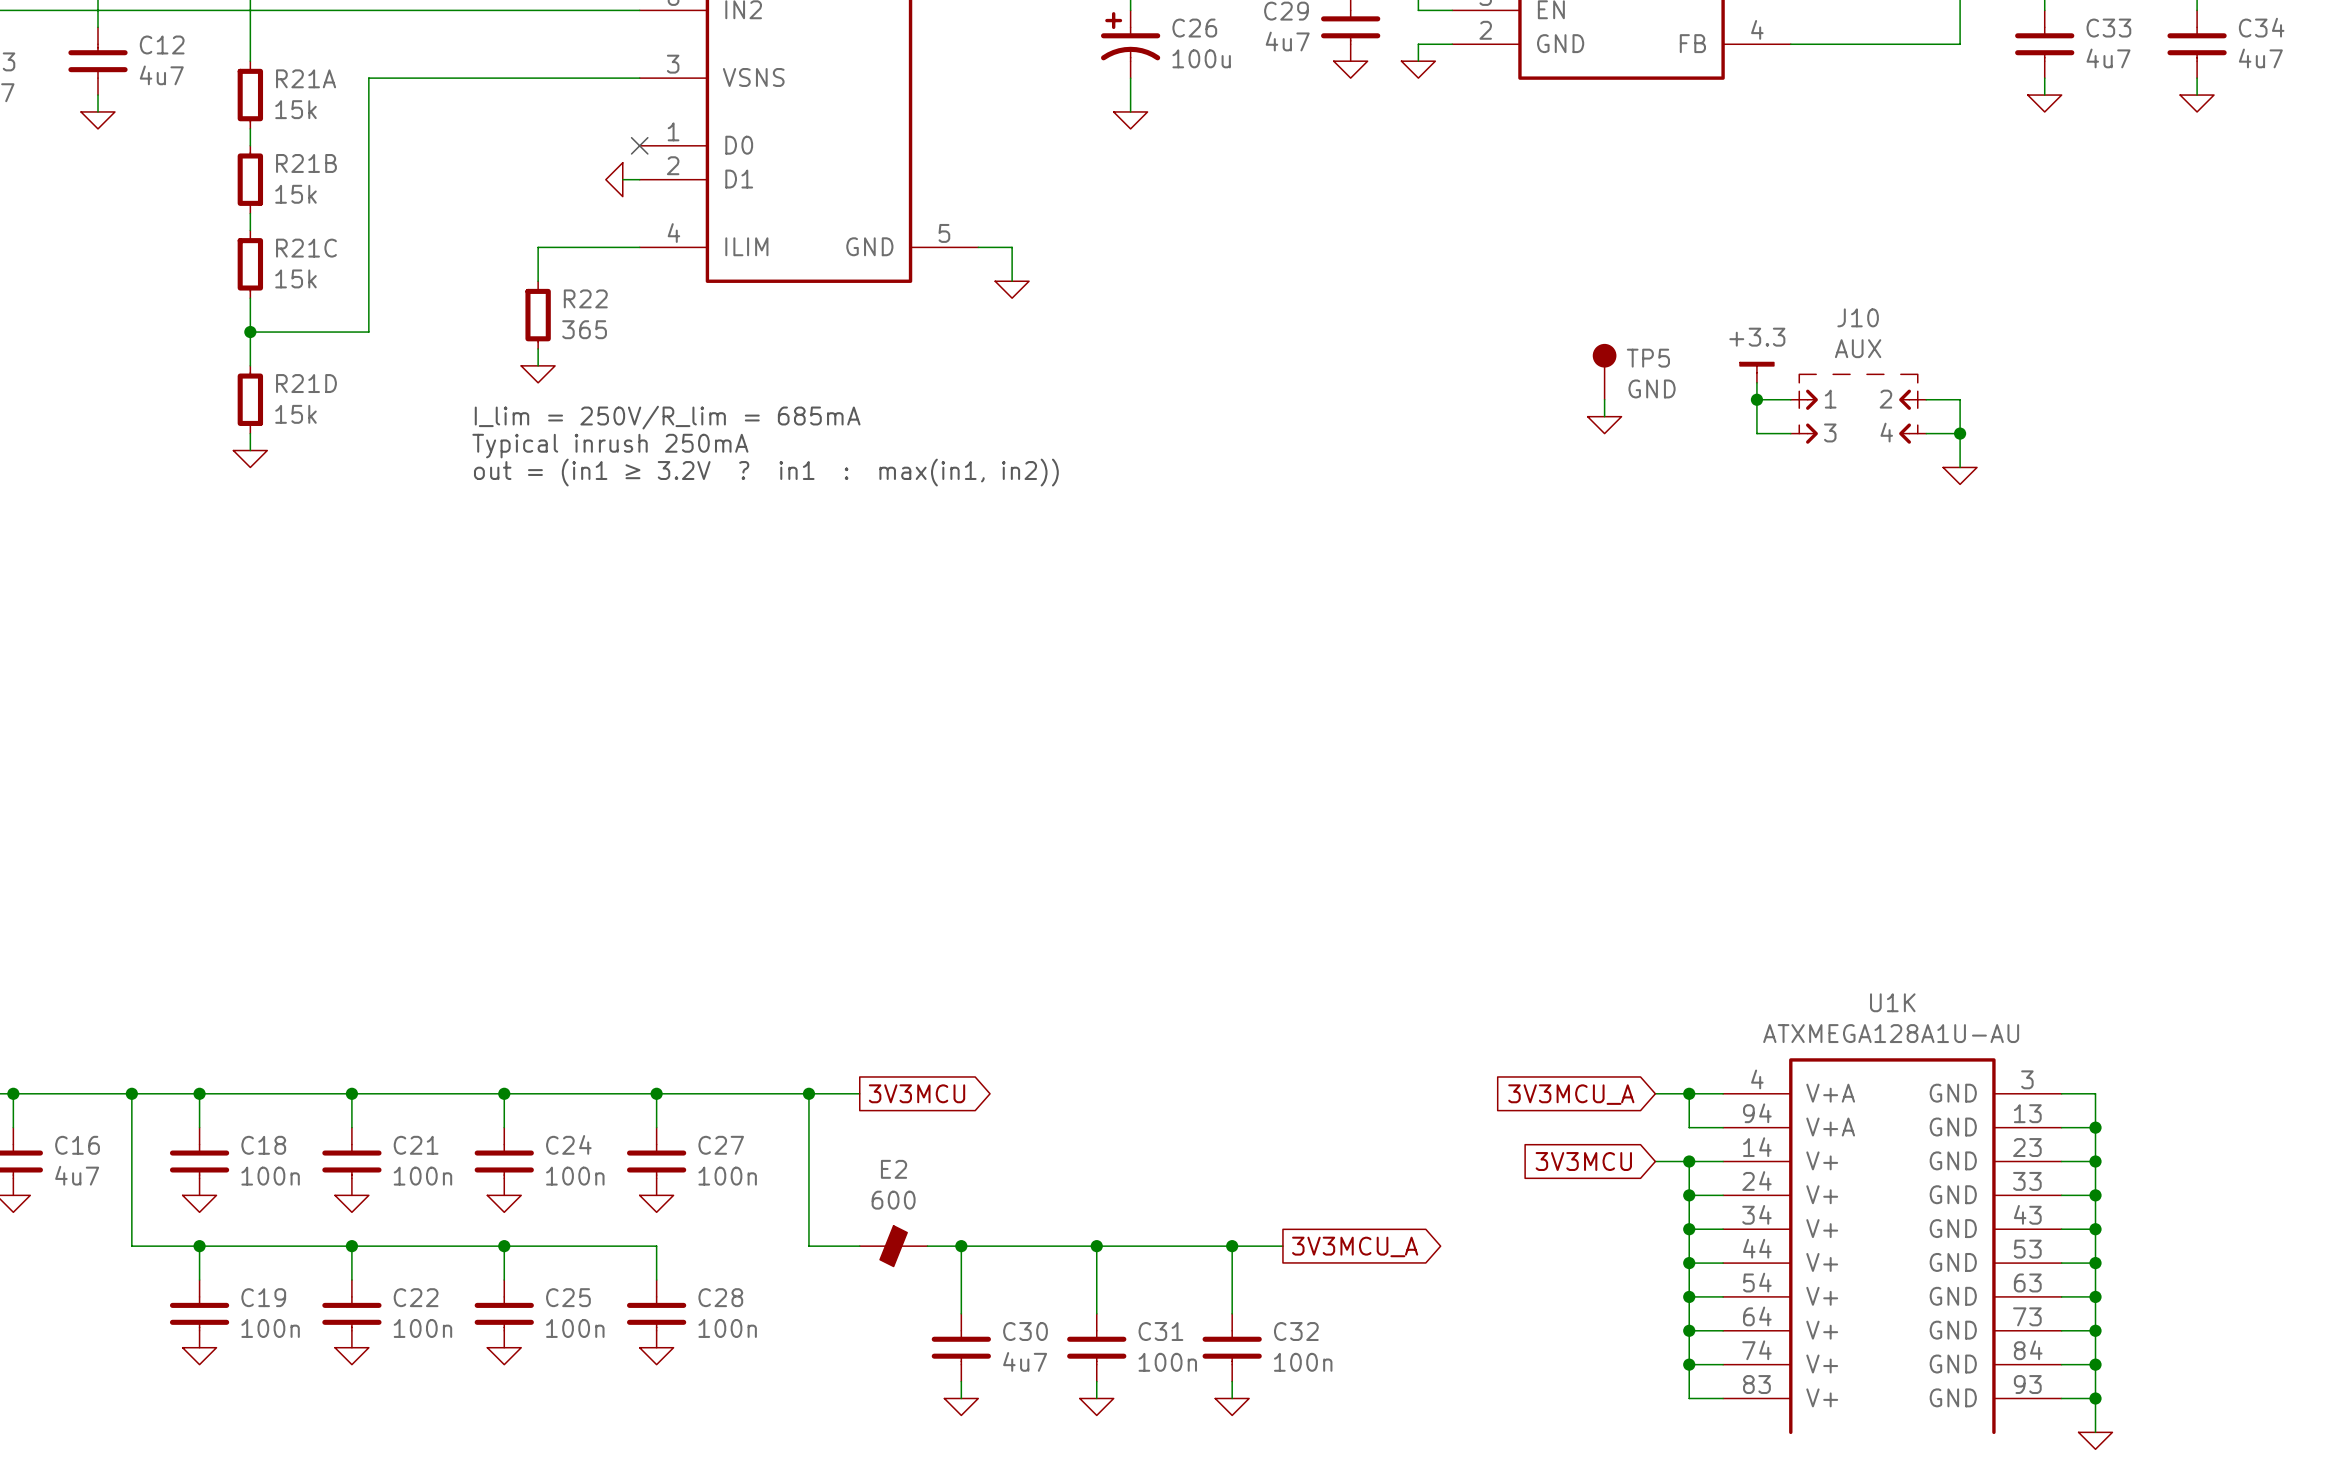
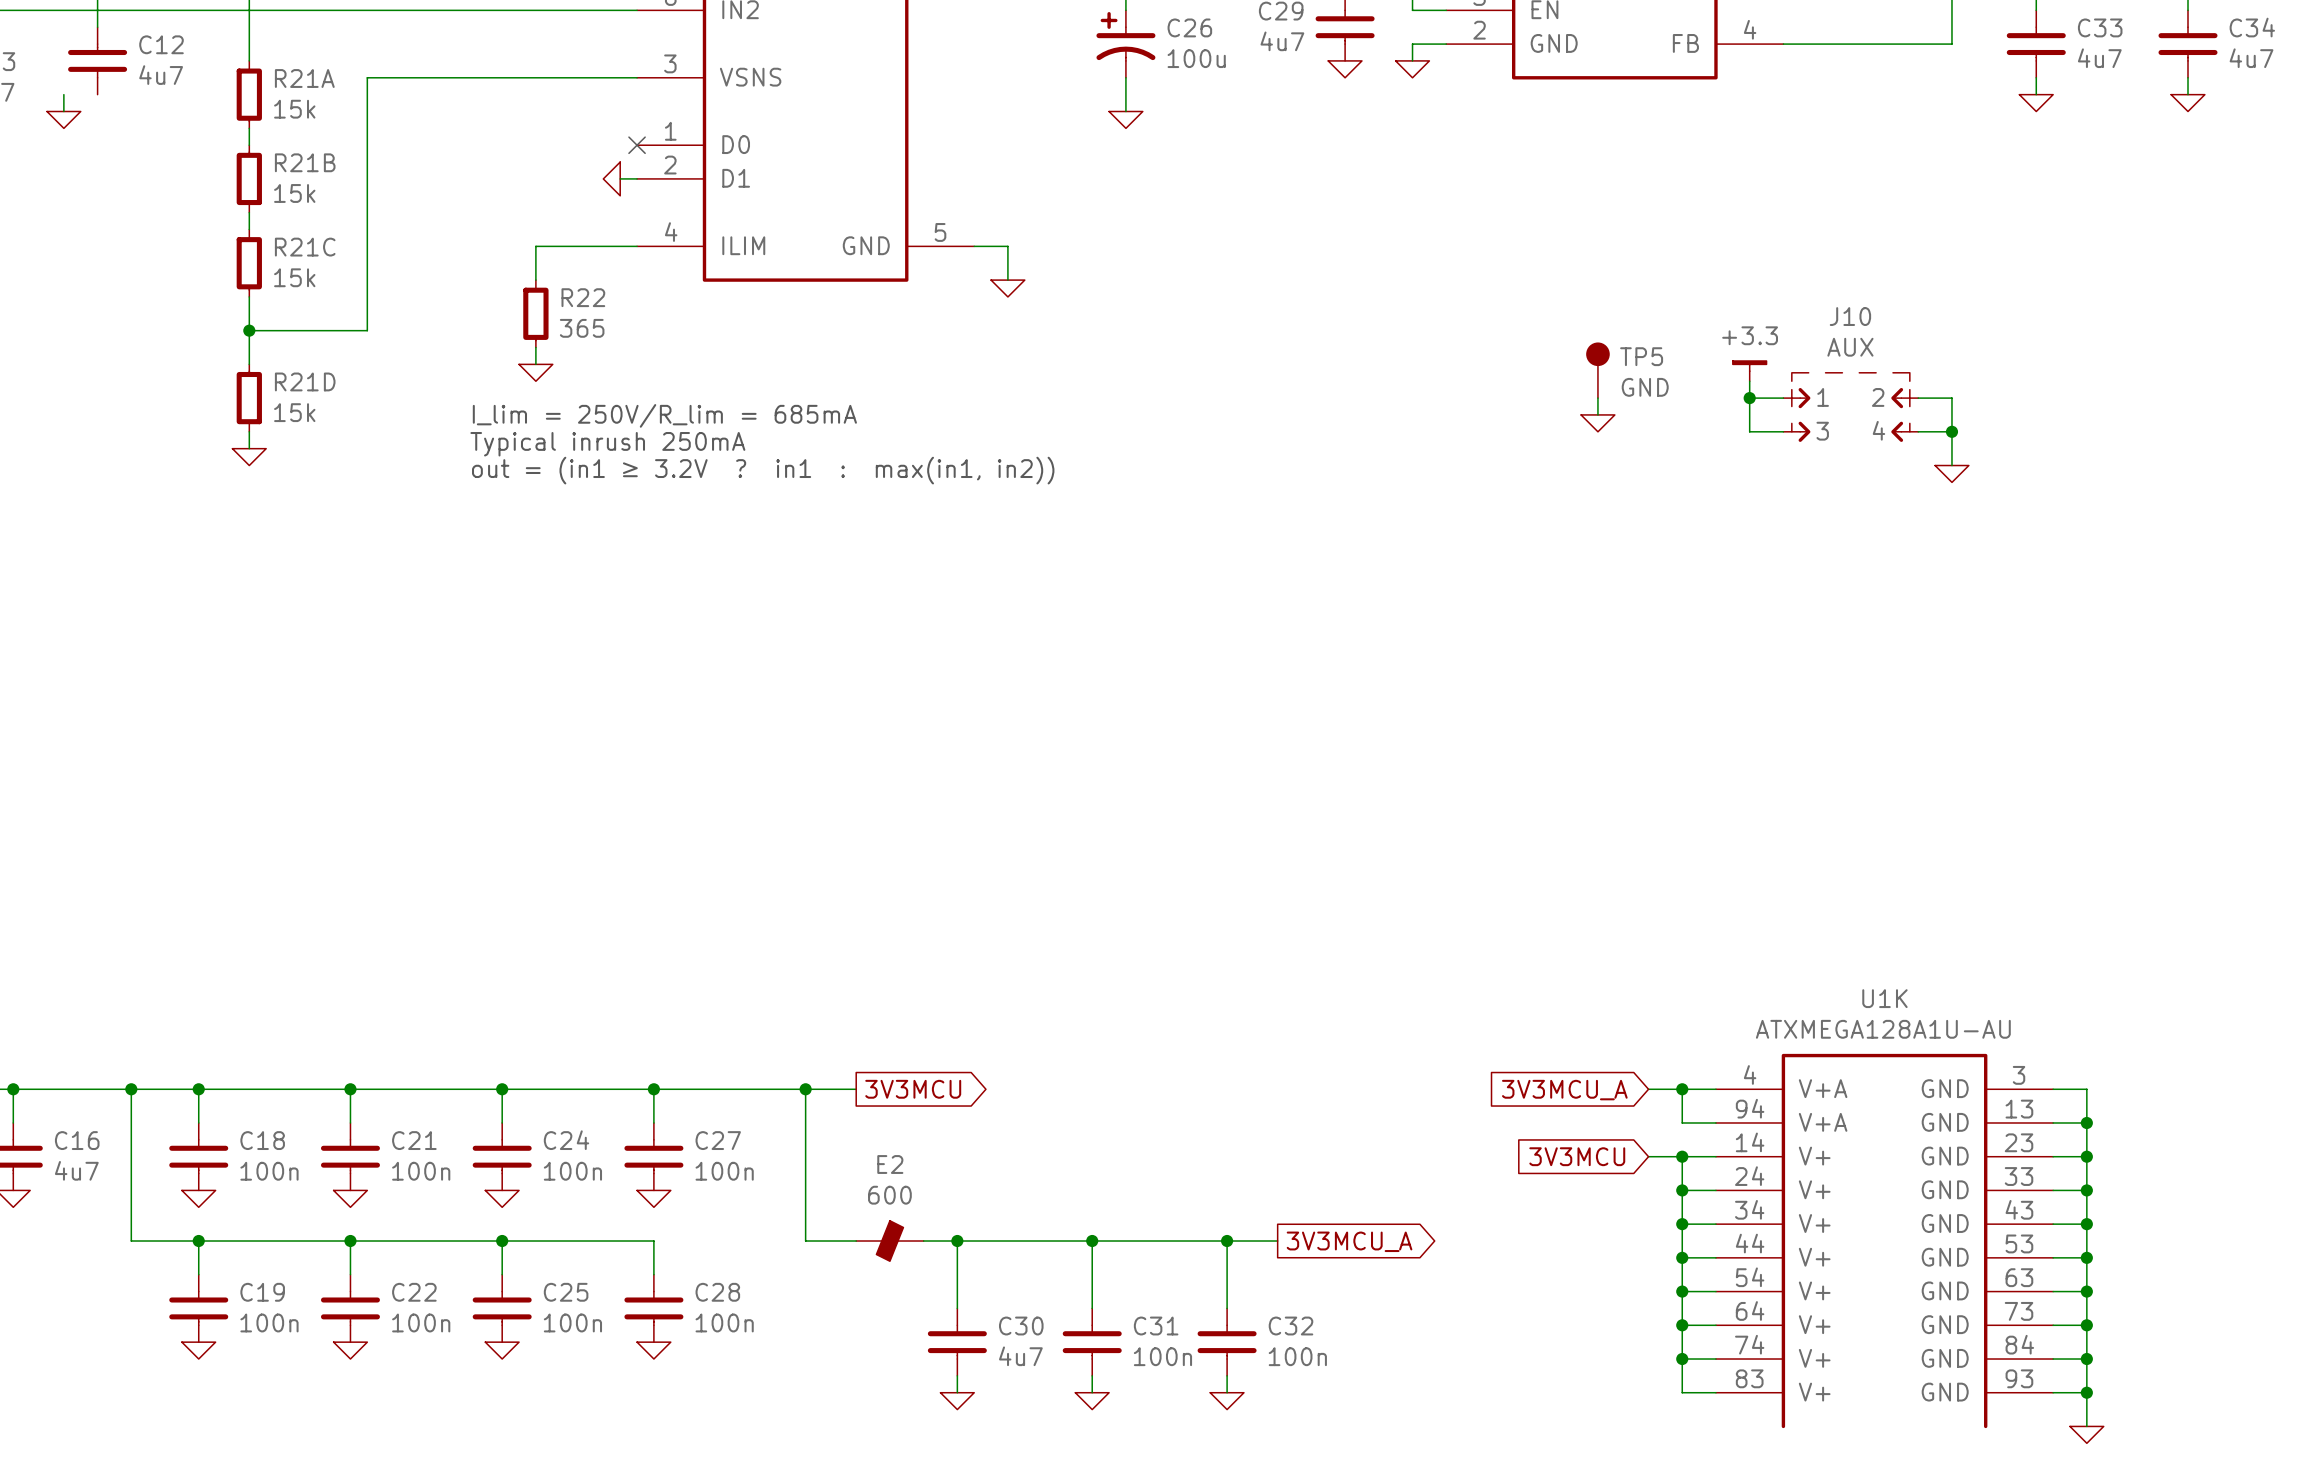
wire: (97, 95) (97, 111) -> (63, 94) (63, 111)
power symbol position: (97, 120) -> (63, 119)

